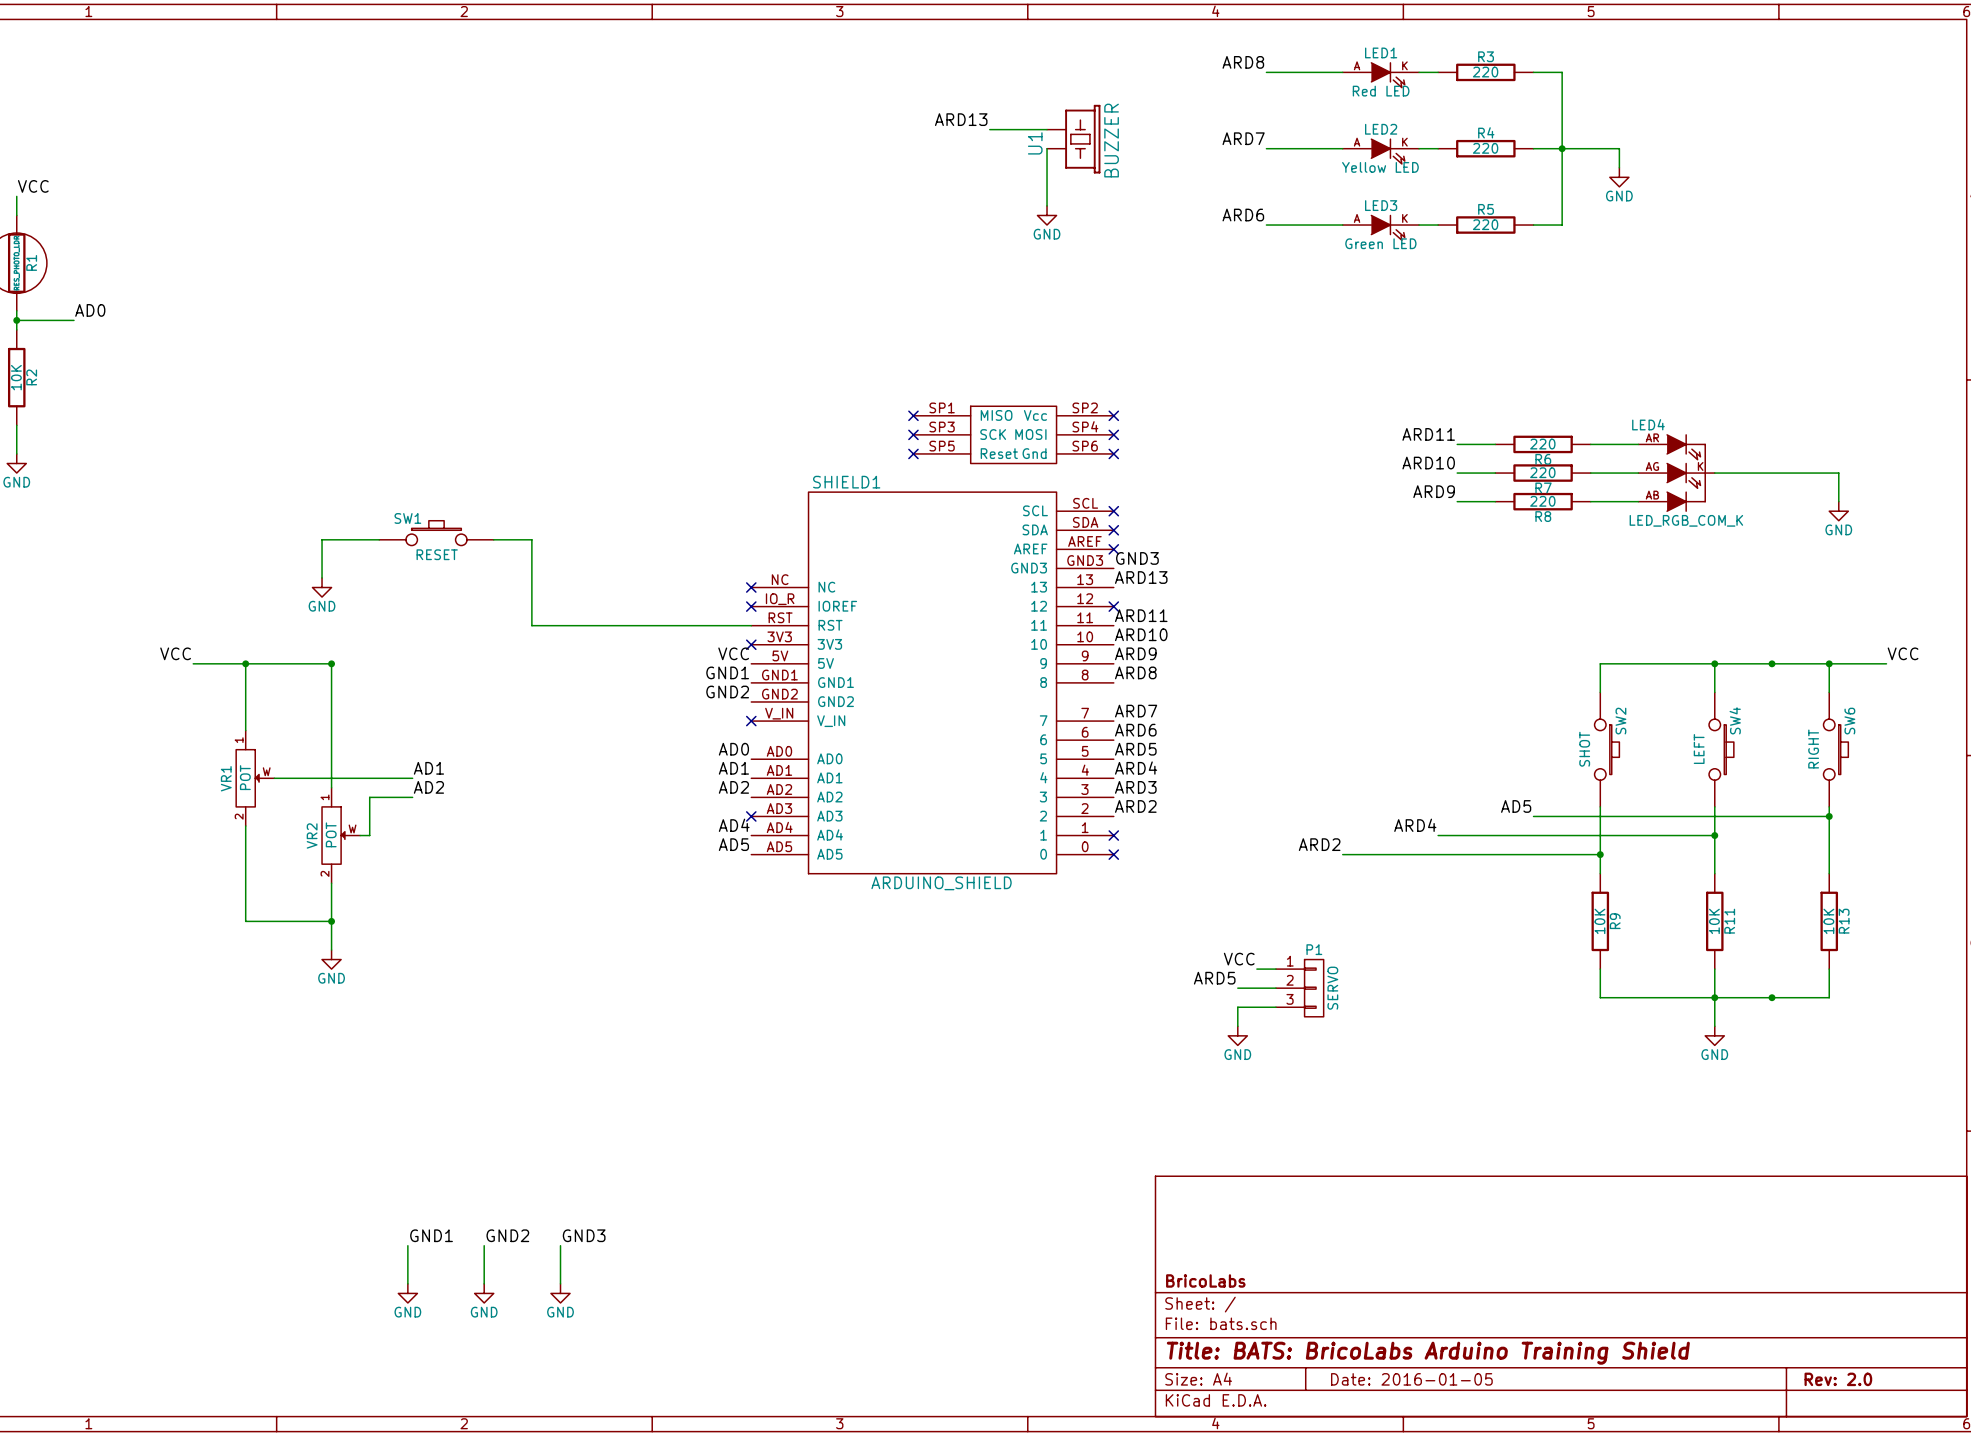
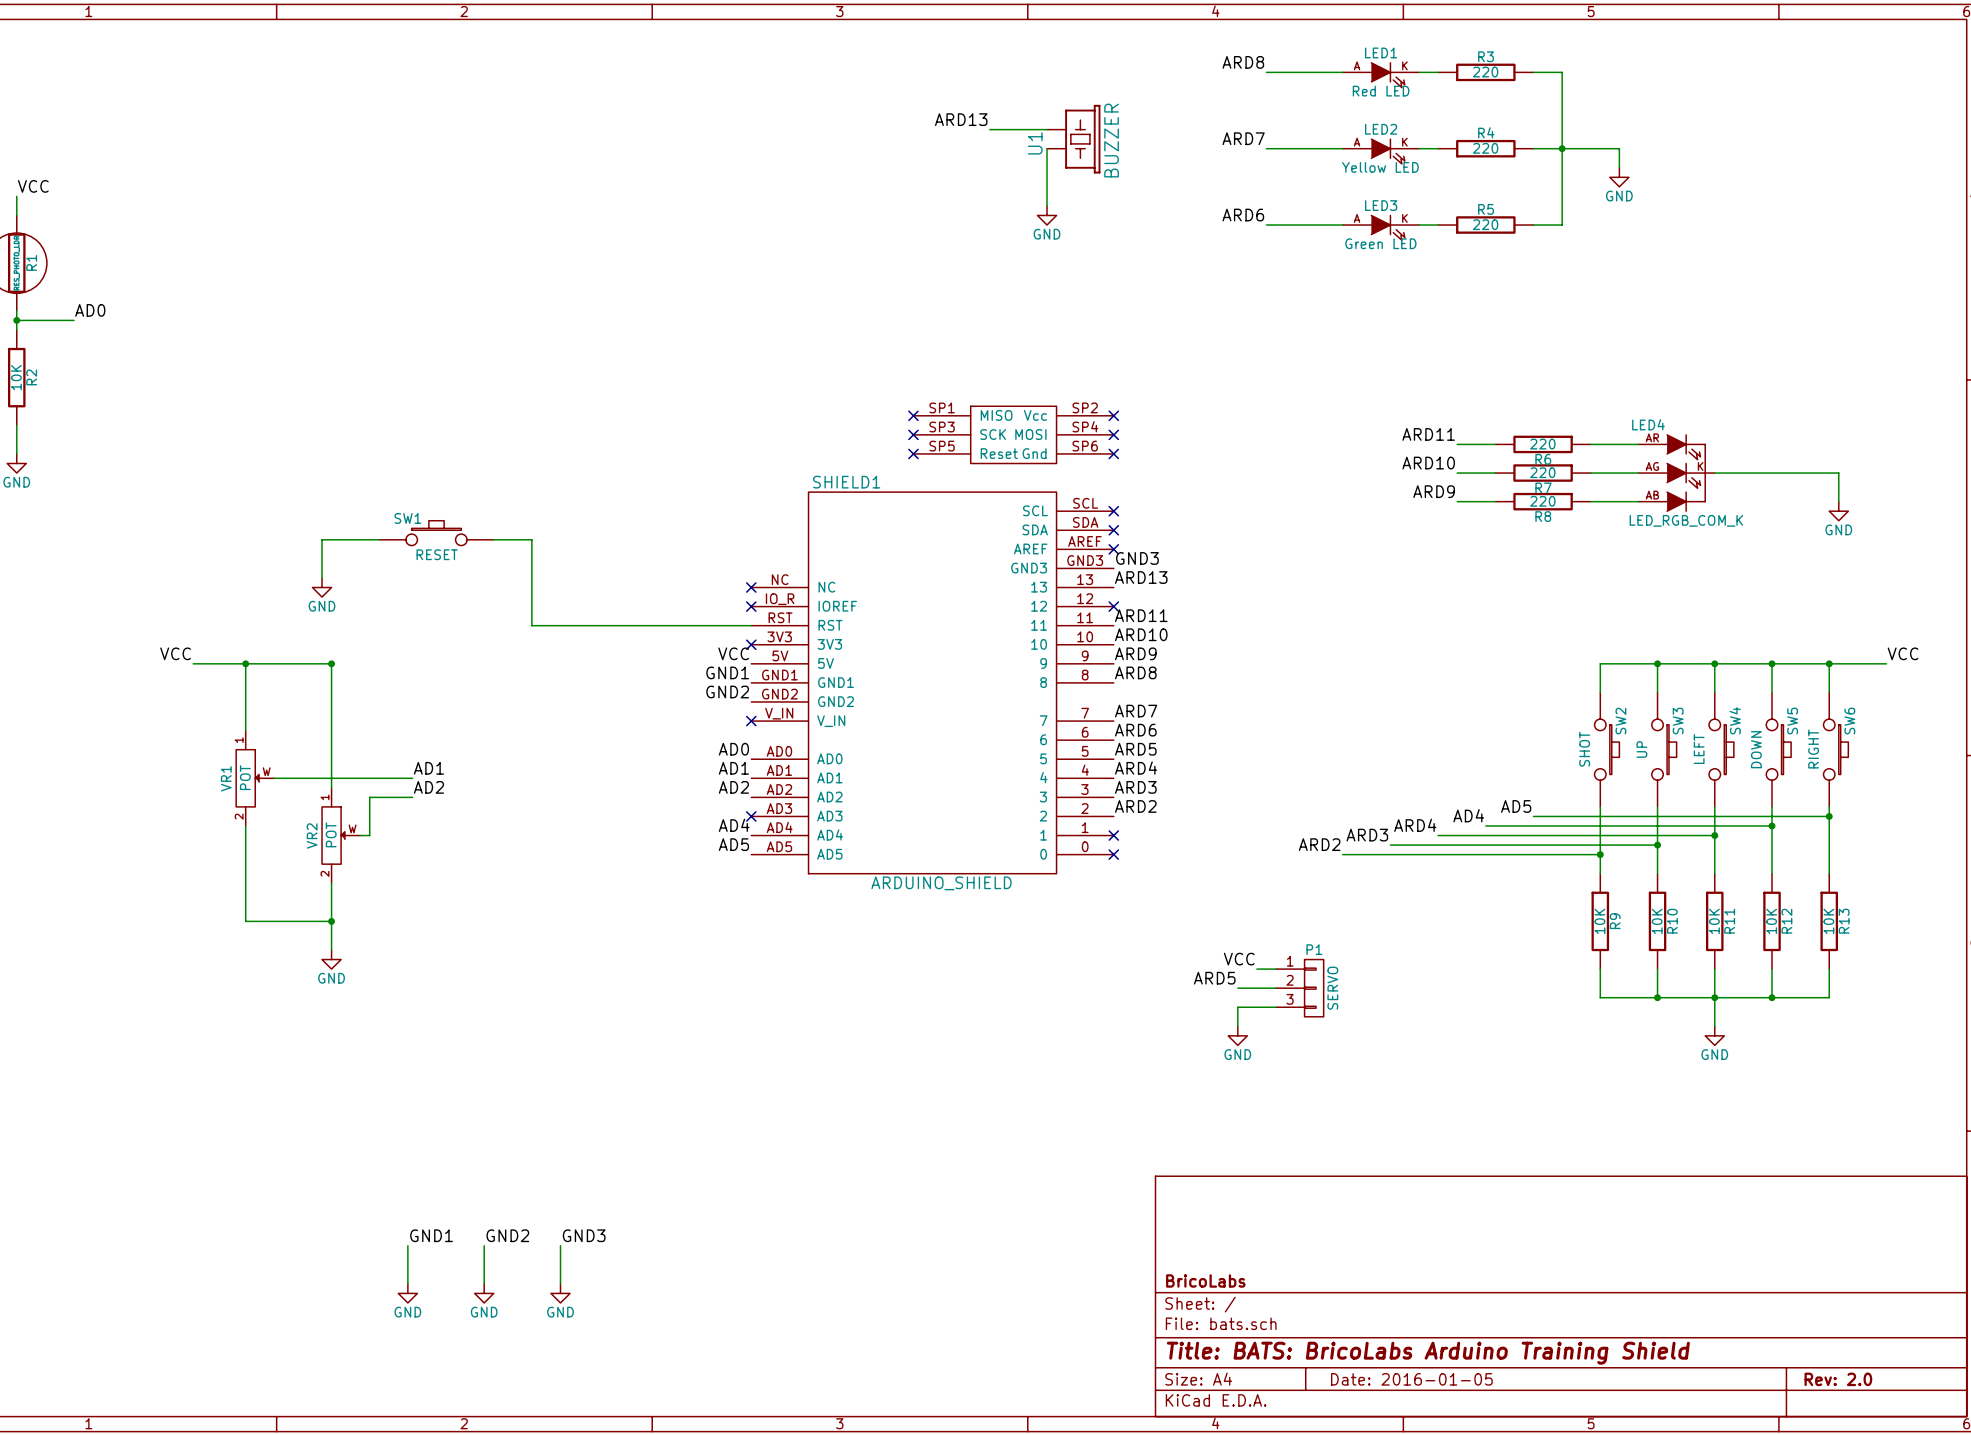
wire: none -> (1657, 663) (1657, 692)
junction: none -> (1657, 663)
wire: none -> (1772, 663) (1772, 692)
SW3: none -> UP (1664, 749)
SW5: none -> DOWN (1778, 749)
wire: none -> (1657, 806) (1657, 873)
wire: none -> (1772, 806) (1772, 873)
label: none -> AD4 (1468, 815)
wire: none -> (1485, 826) (1772, 826)
junction: none -> (1772, 826)
label: none -> ARD3 (1367, 835)
wire: none -> (1390, 845) (1657, 845)
junction: none -> (1657, 845)
R10: none -> 10K (1657, 921)
R12: none -> 10K (1772, 921)
wire: none -> (1657, 969) (1657, 997)
wire: none -> (1772, 969) (1772, 997)
junction: none -> (1657, 997)

